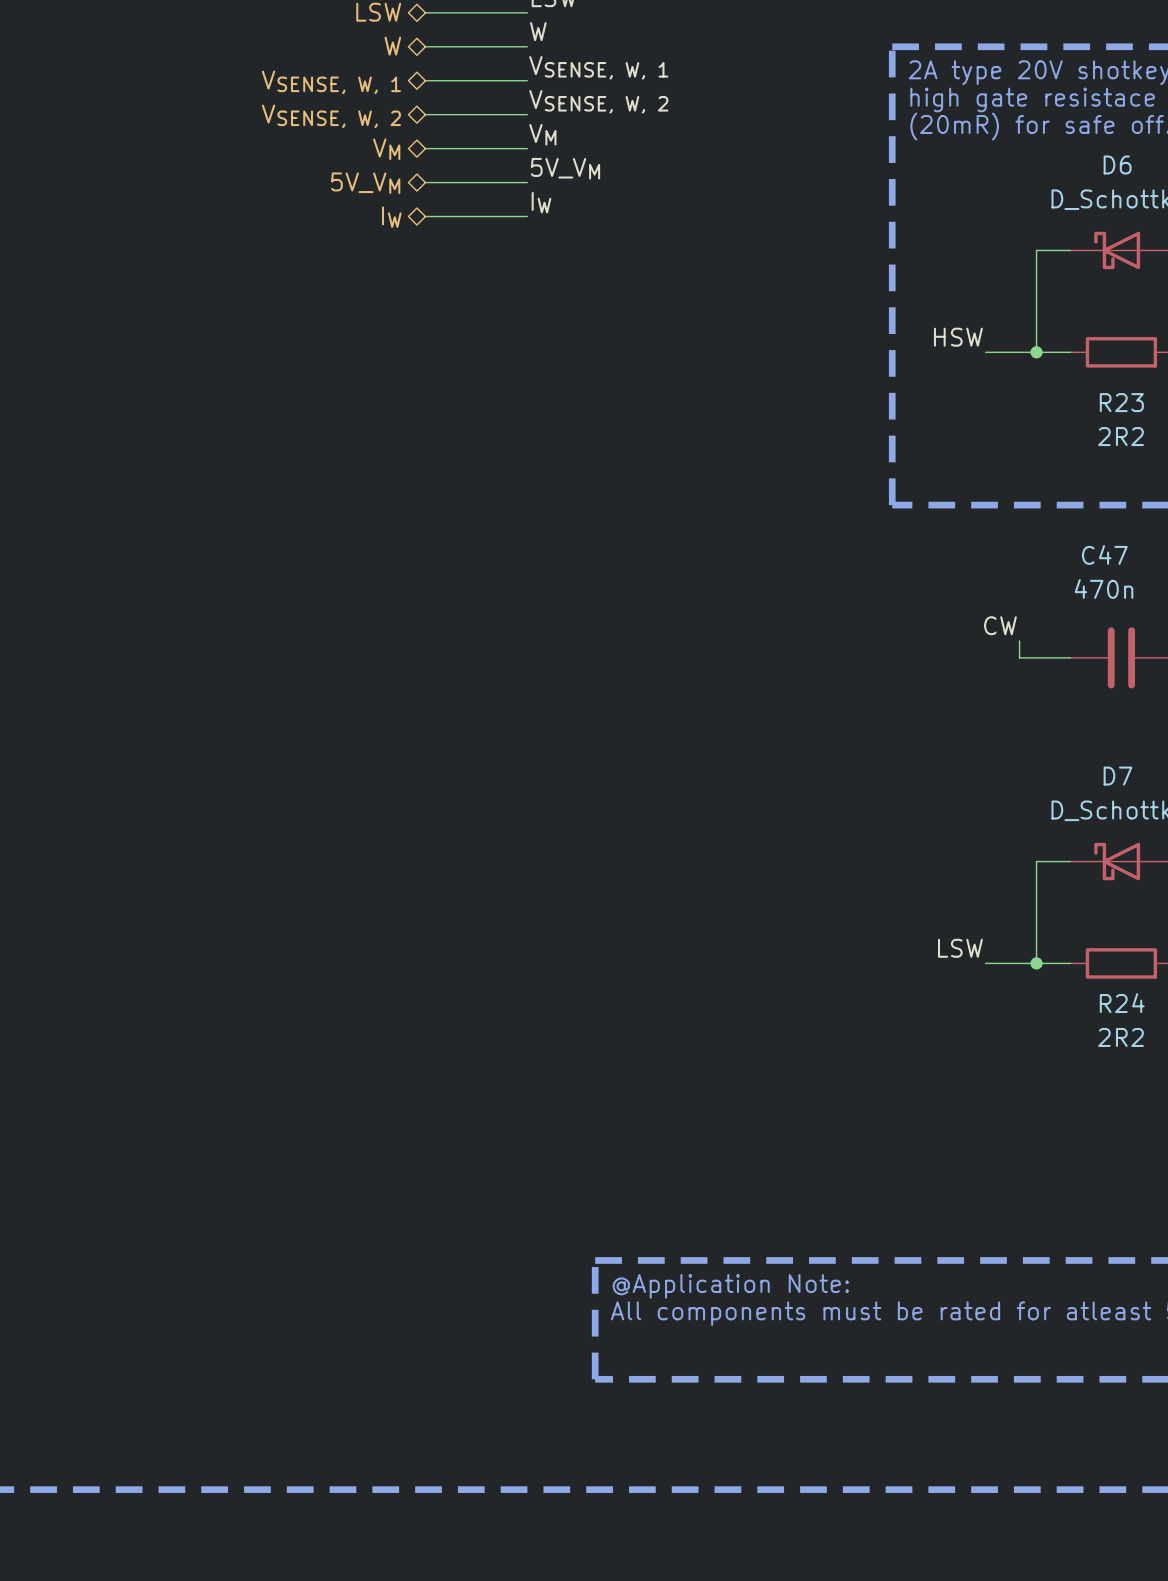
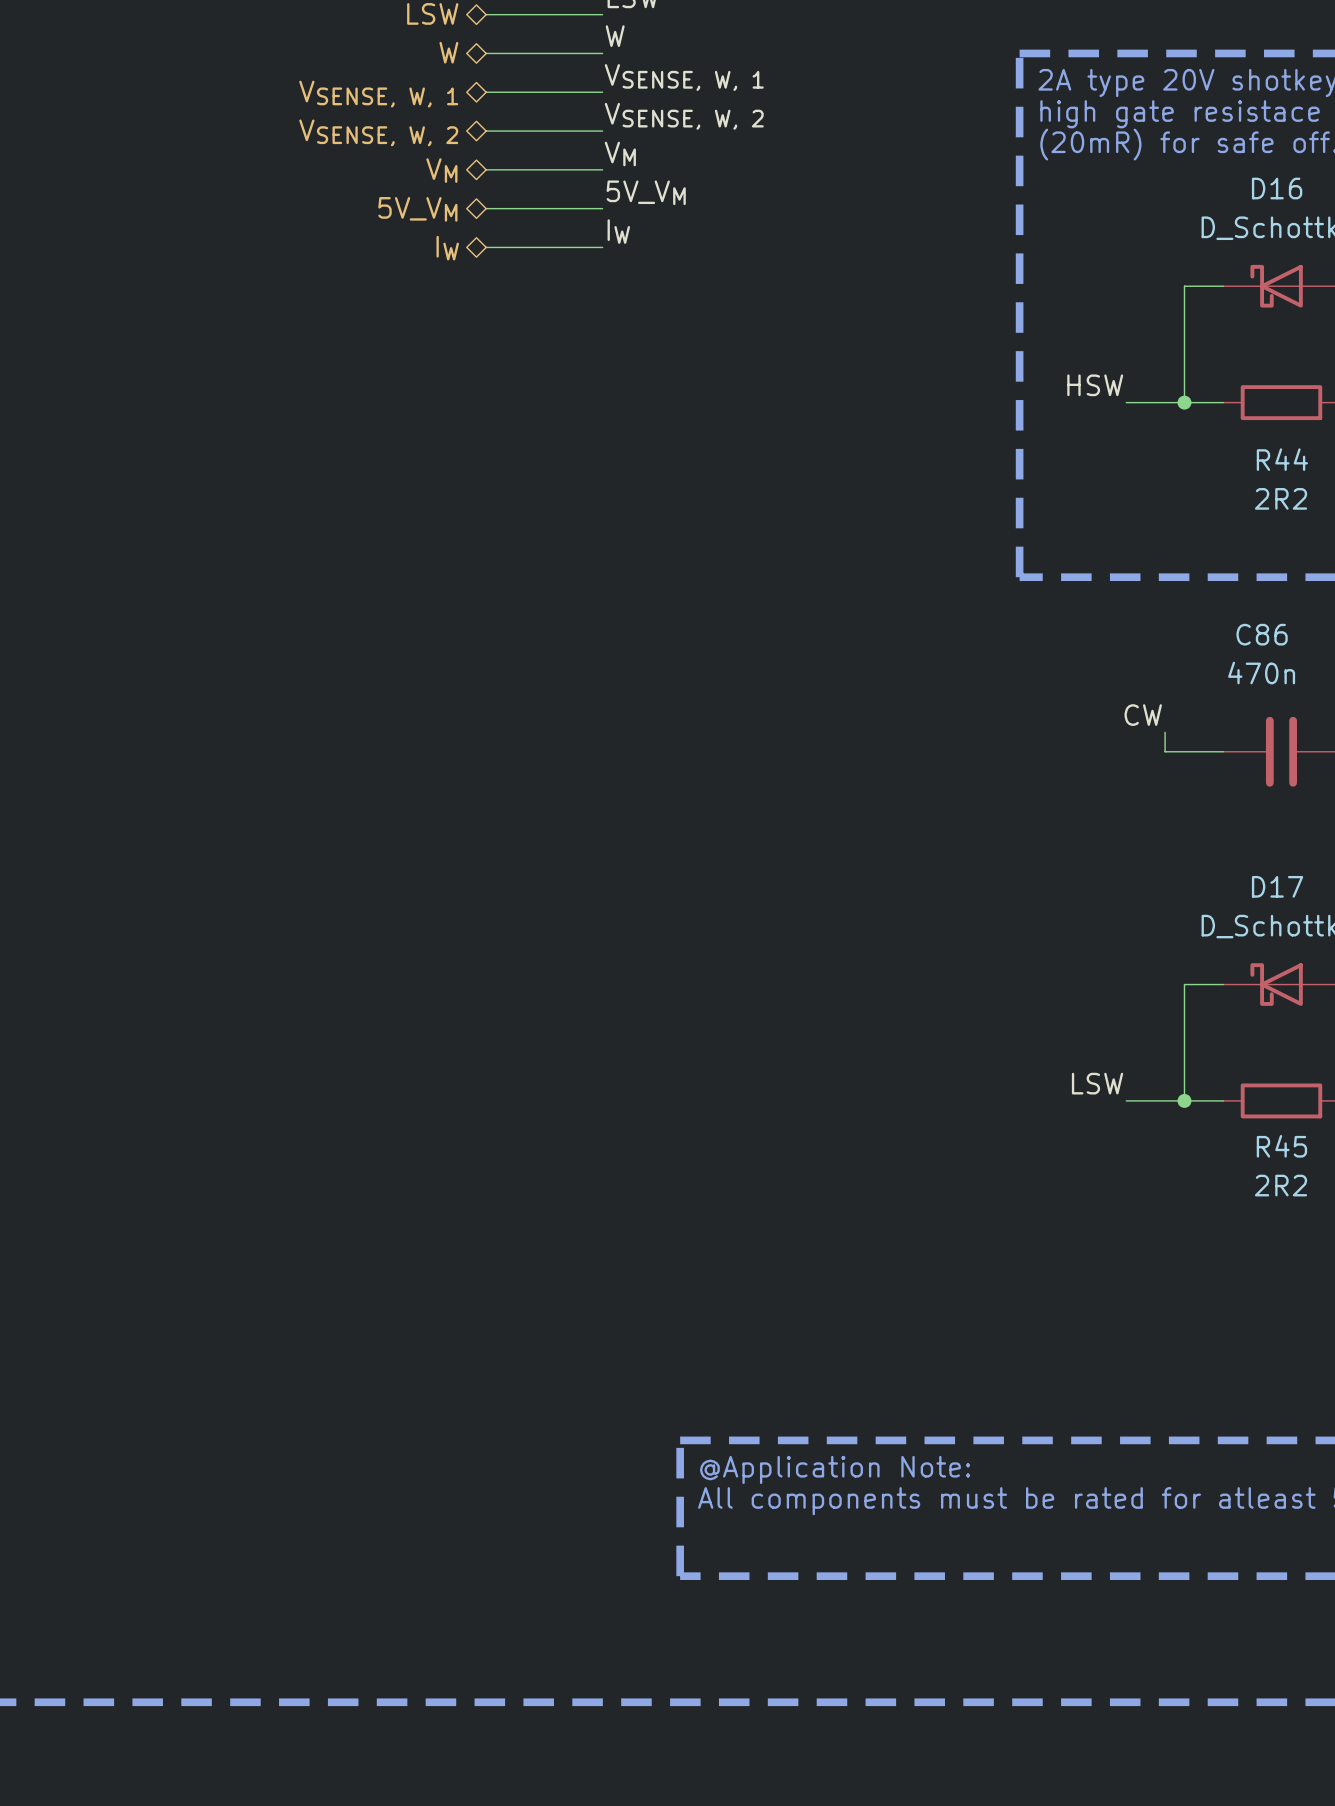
D6 name: D6 (1117, 164) -> D16 (1277, 188)
R23 name: R23 (1121, 402) -> R44 (1282, 459)
C47 name: C47 (1104, 554) -> C86 (1262, 634)
D7 name: D7 (1117, 776) -> D17 (1277, 886)
R24 name: R24 (1122, 1003) -> R45 (1281, 1146)

